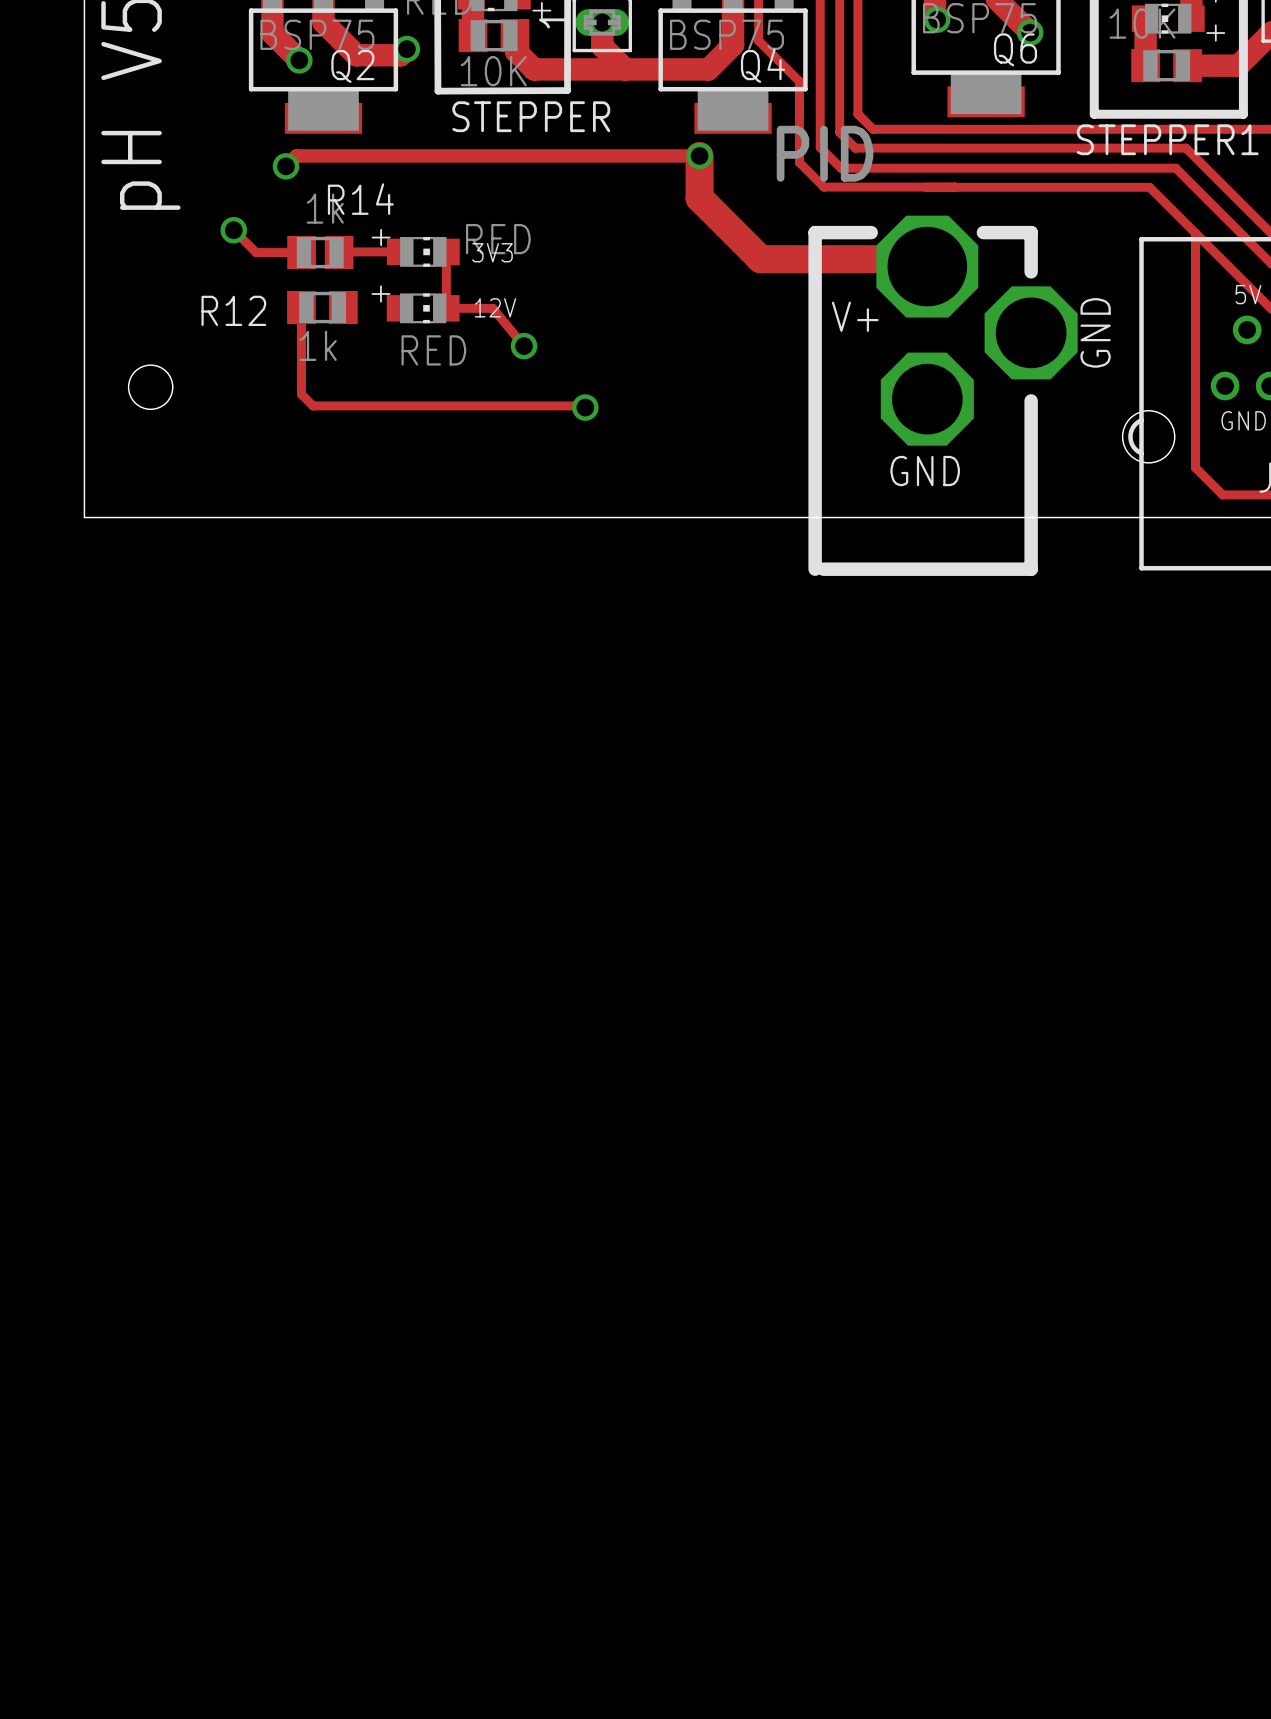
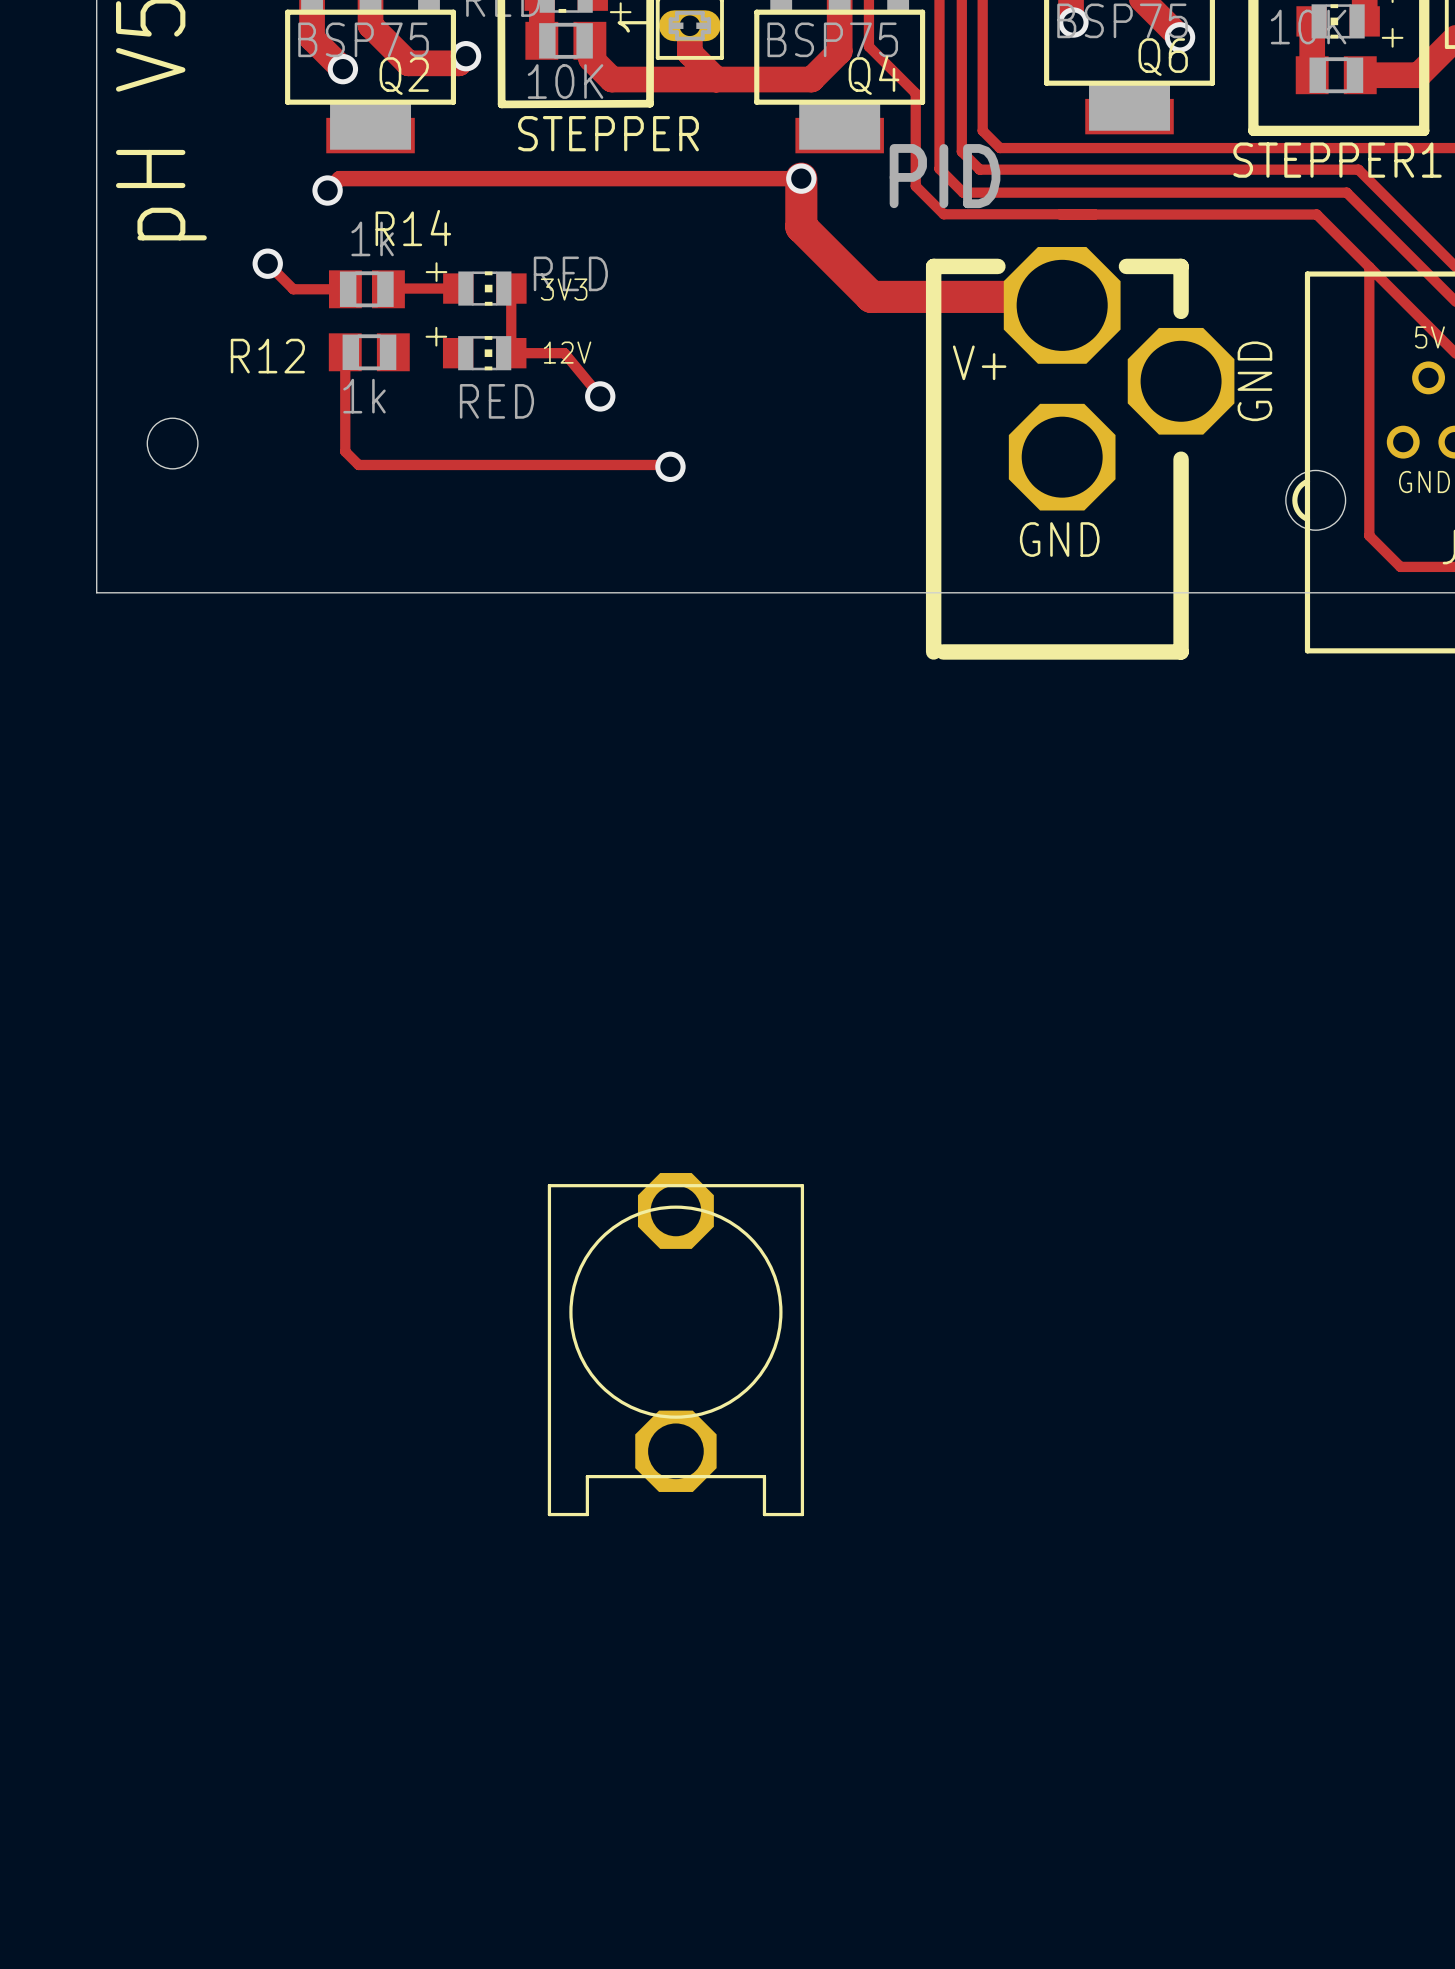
part: none -> (675, 1344)

